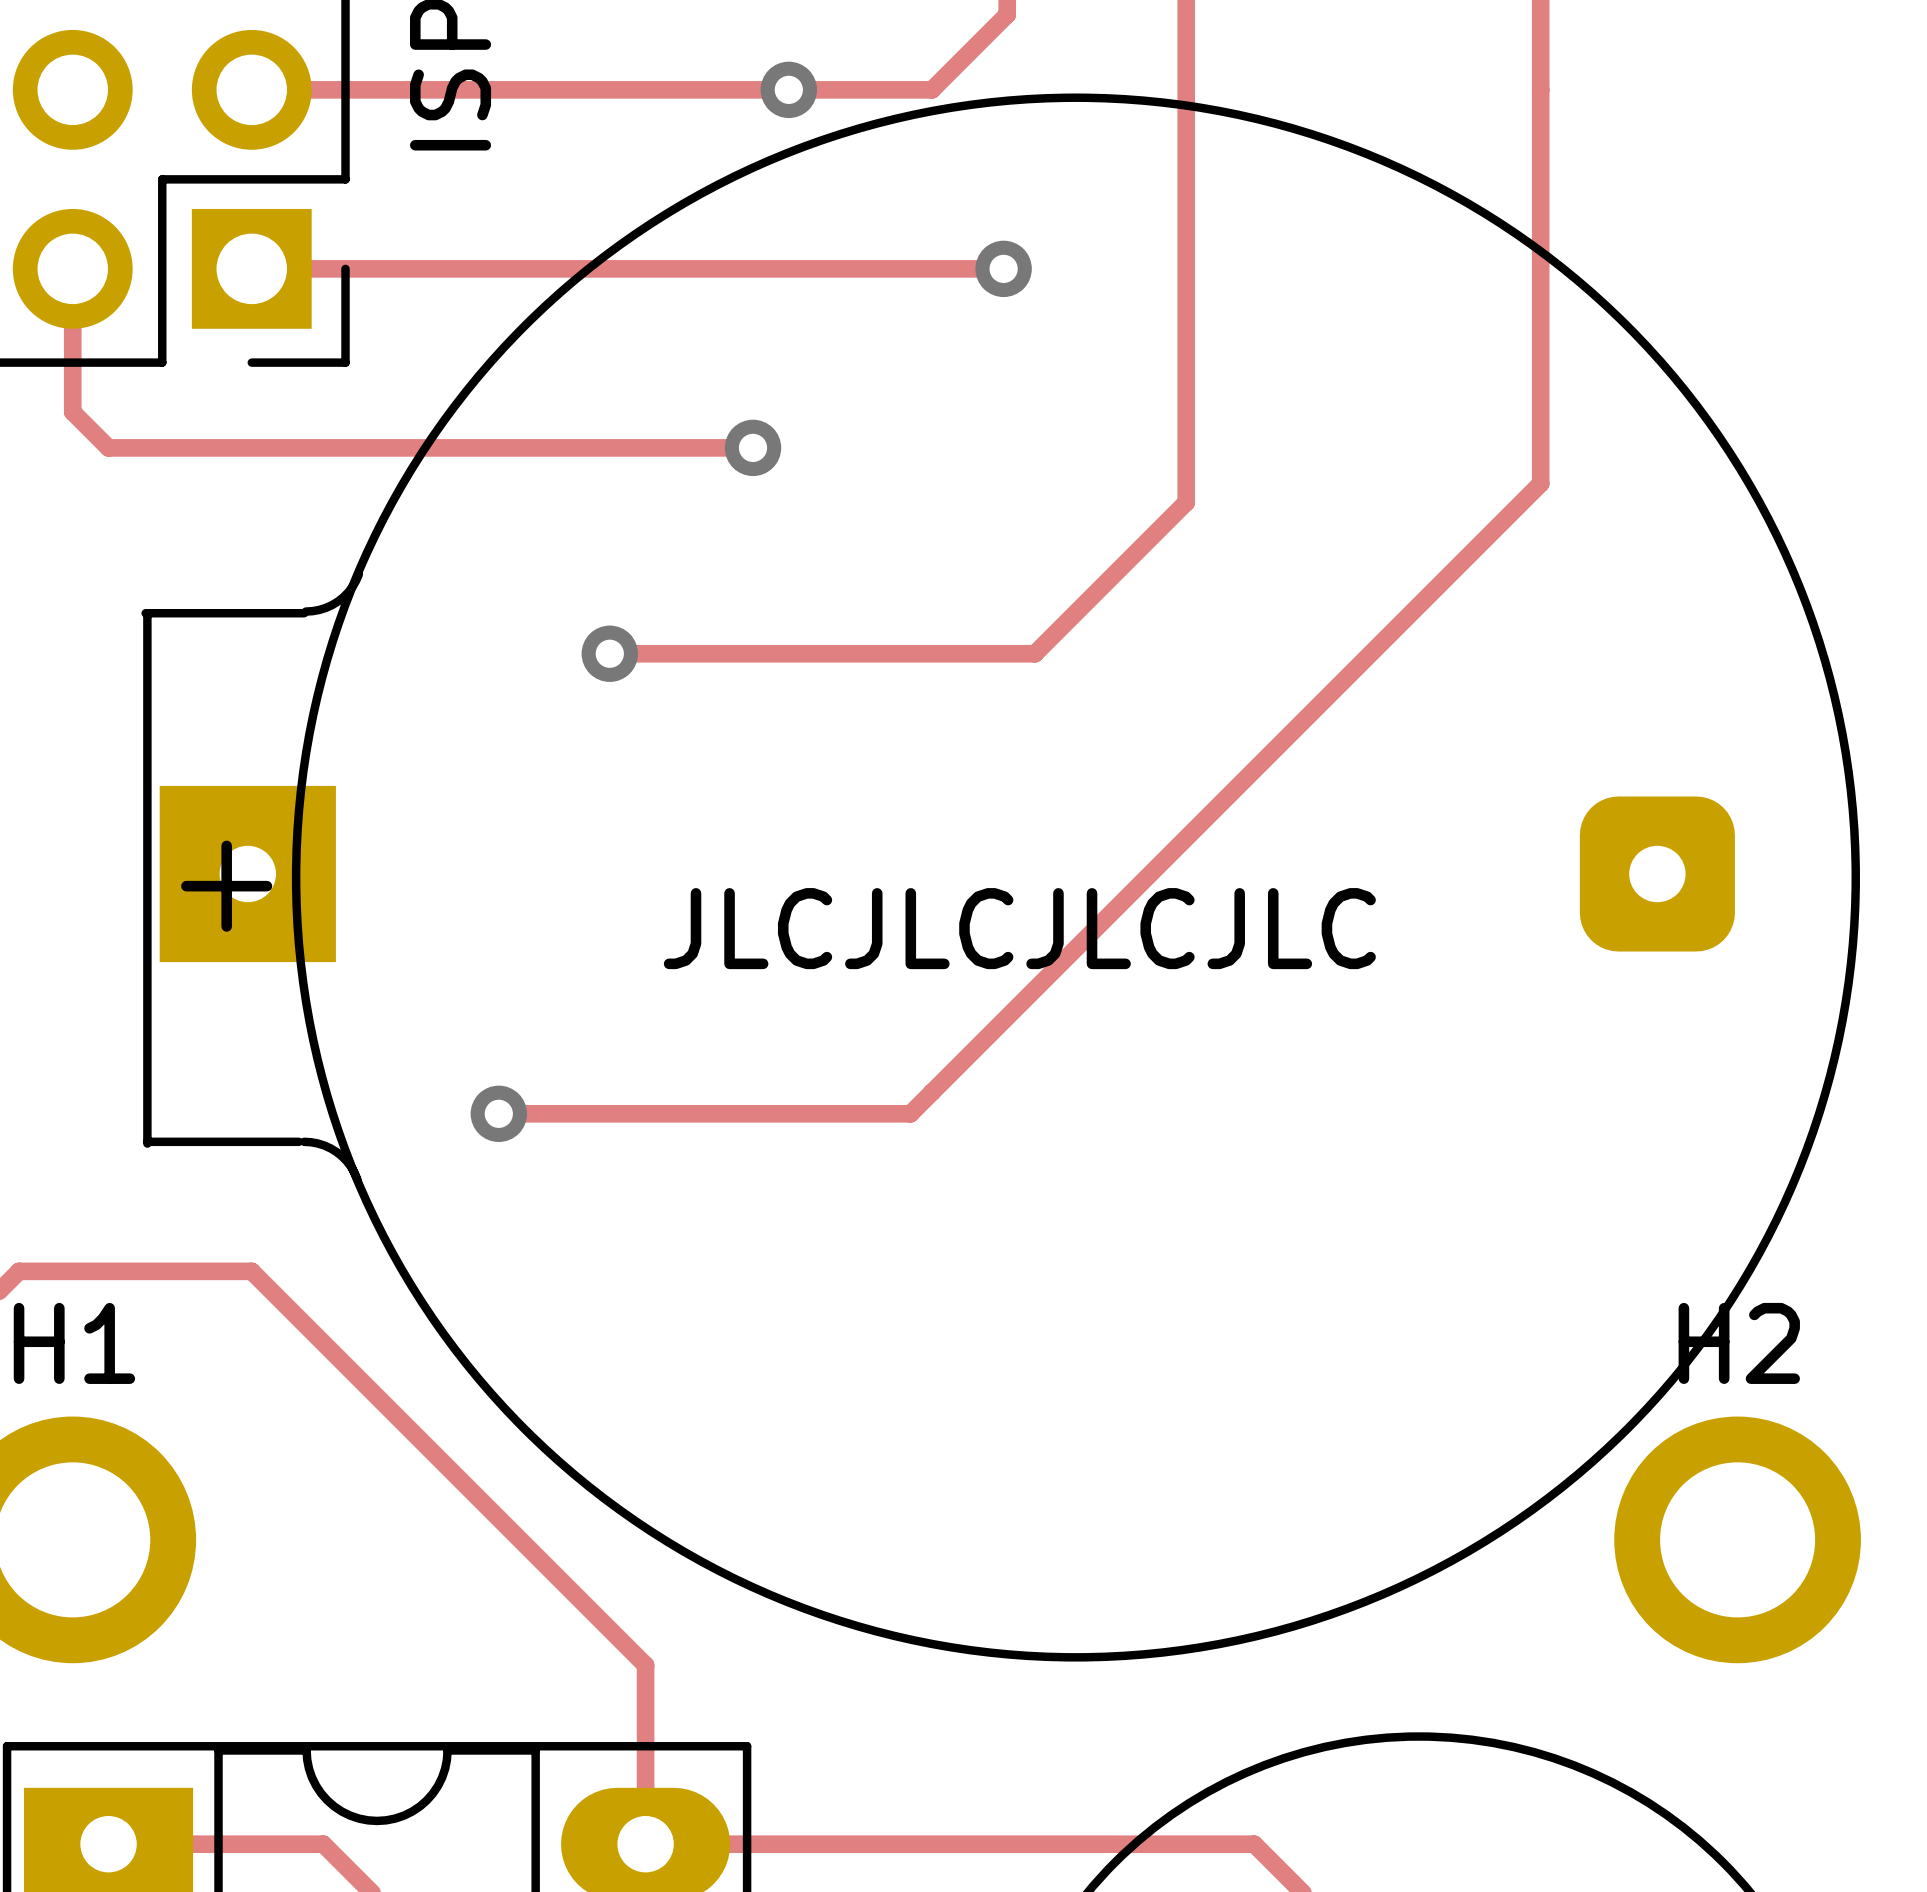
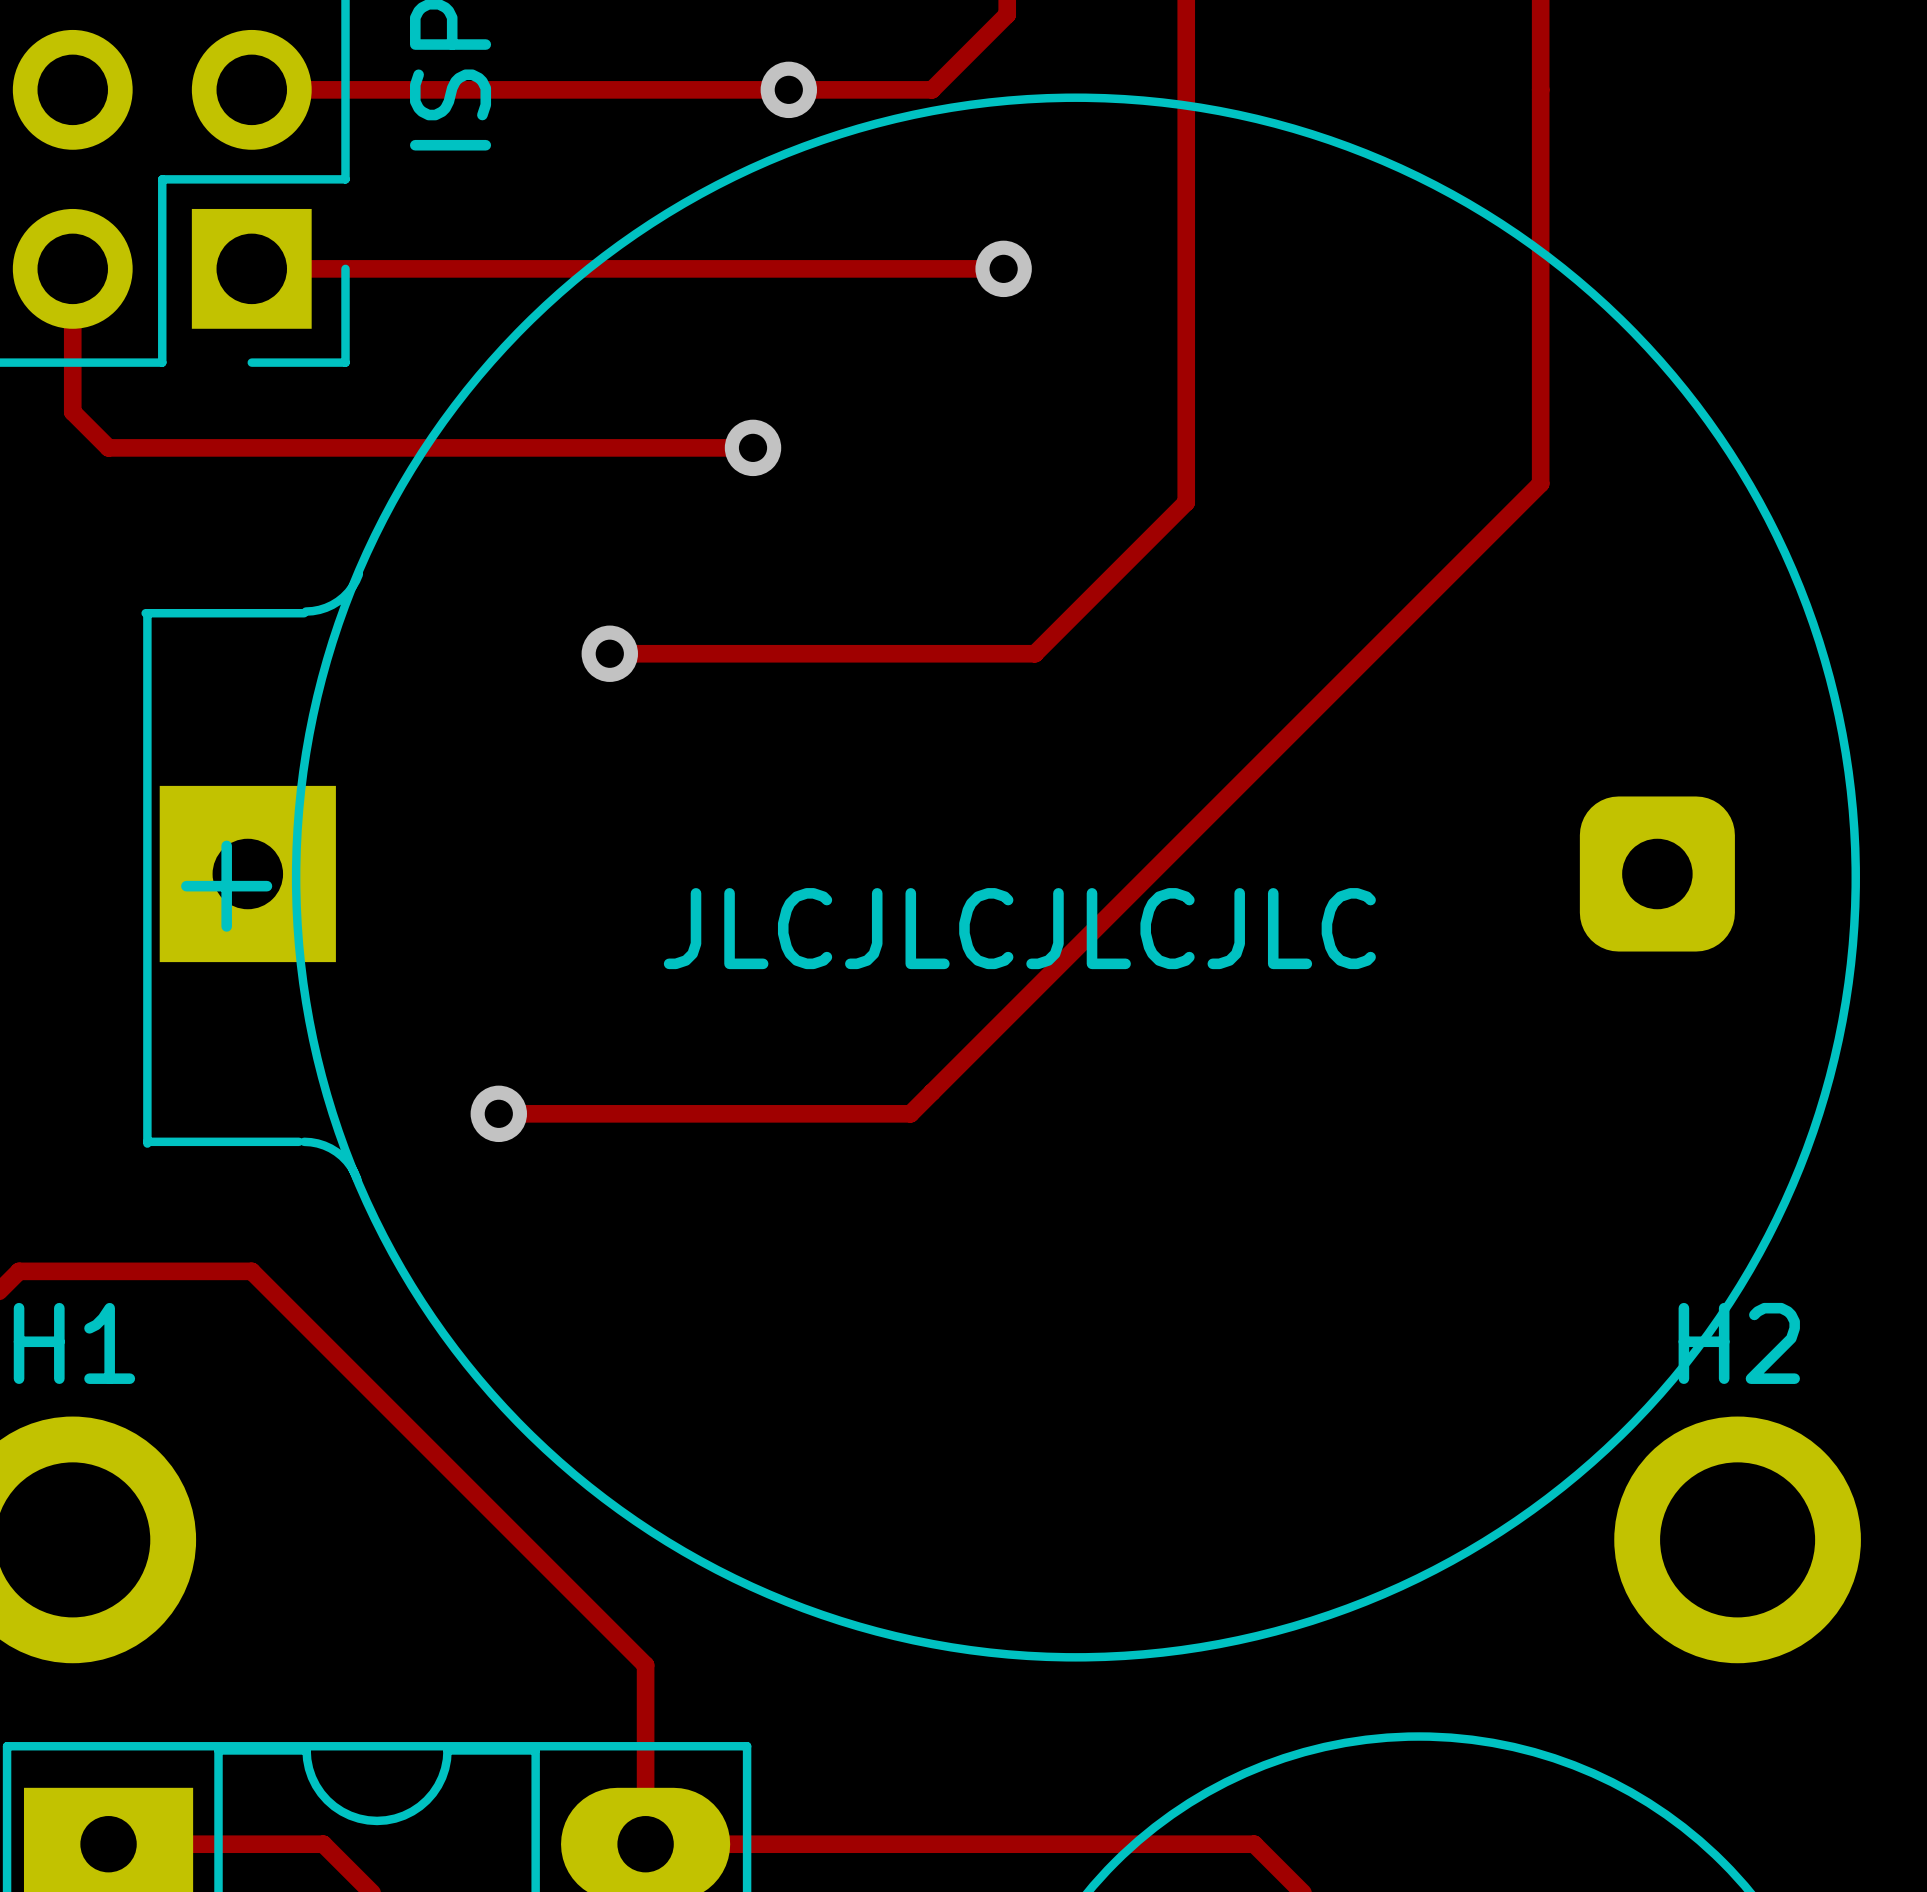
part footprint: [141, 93, 1860, 1662] -> [141, 93, 1860, 1662]

